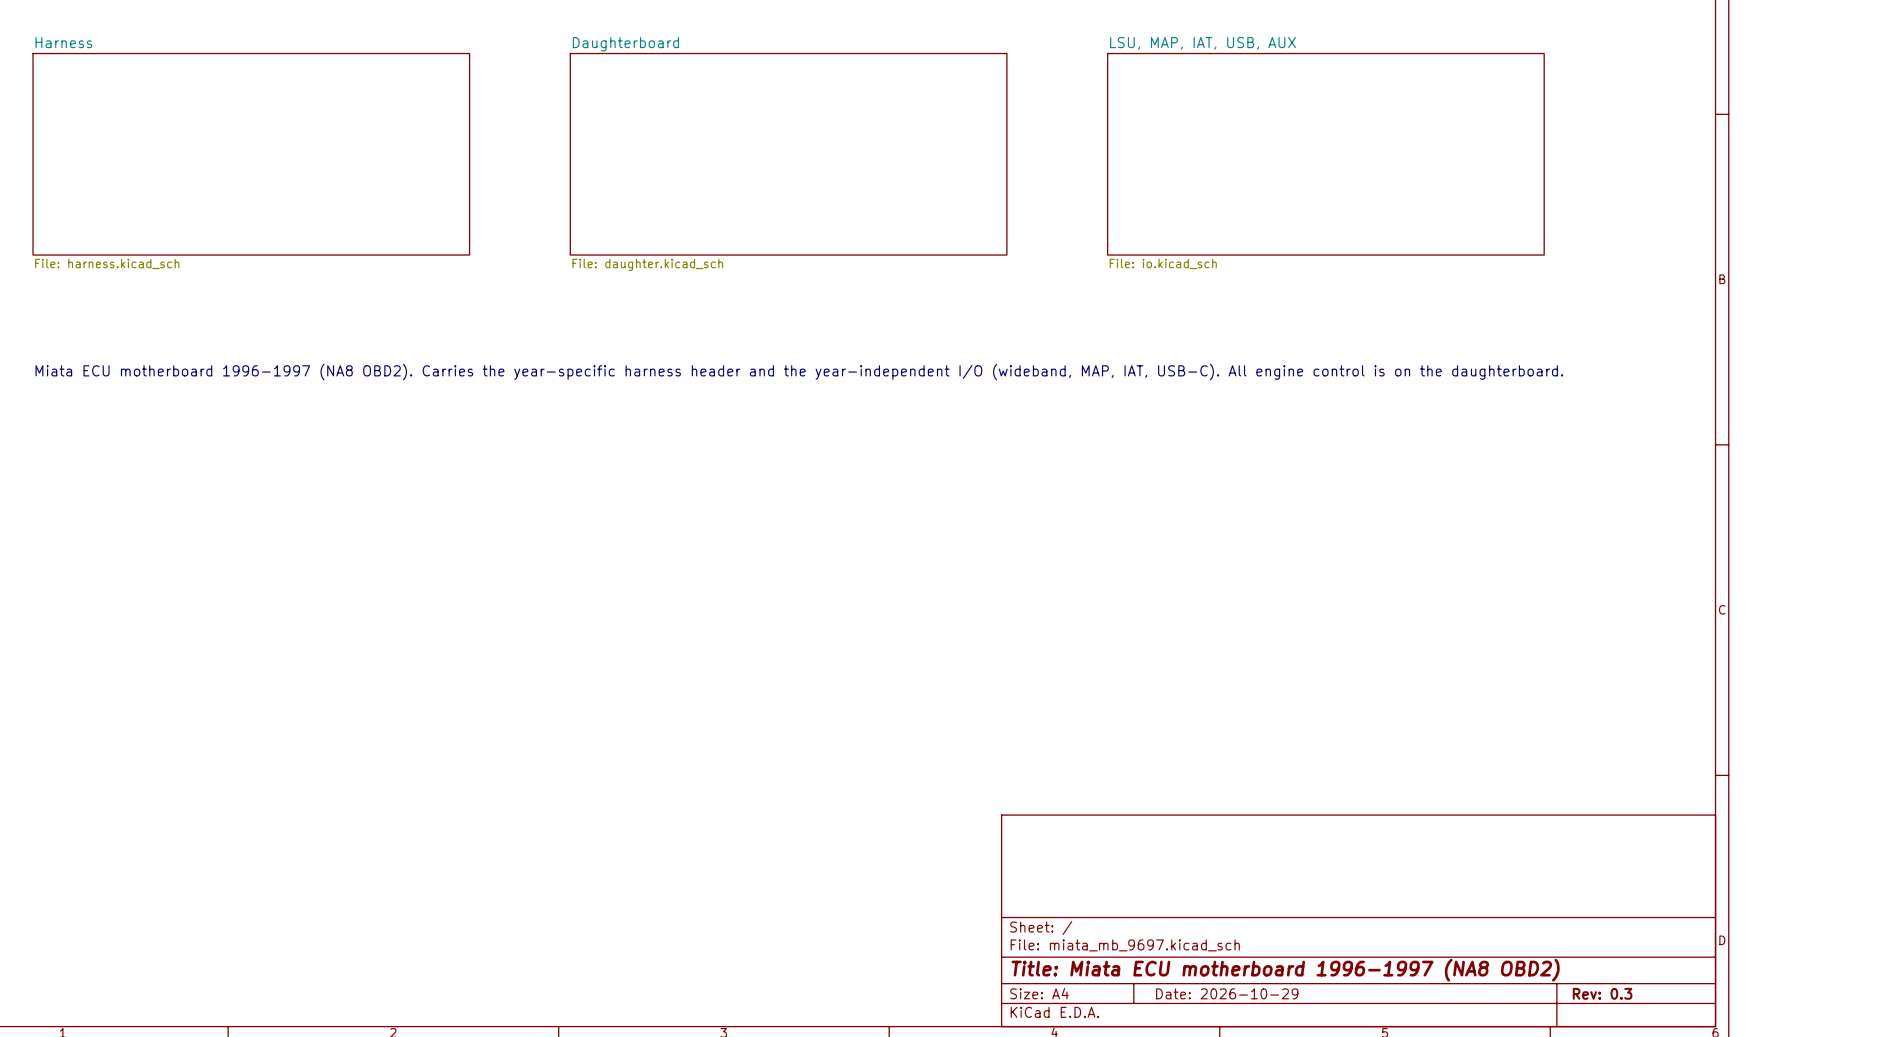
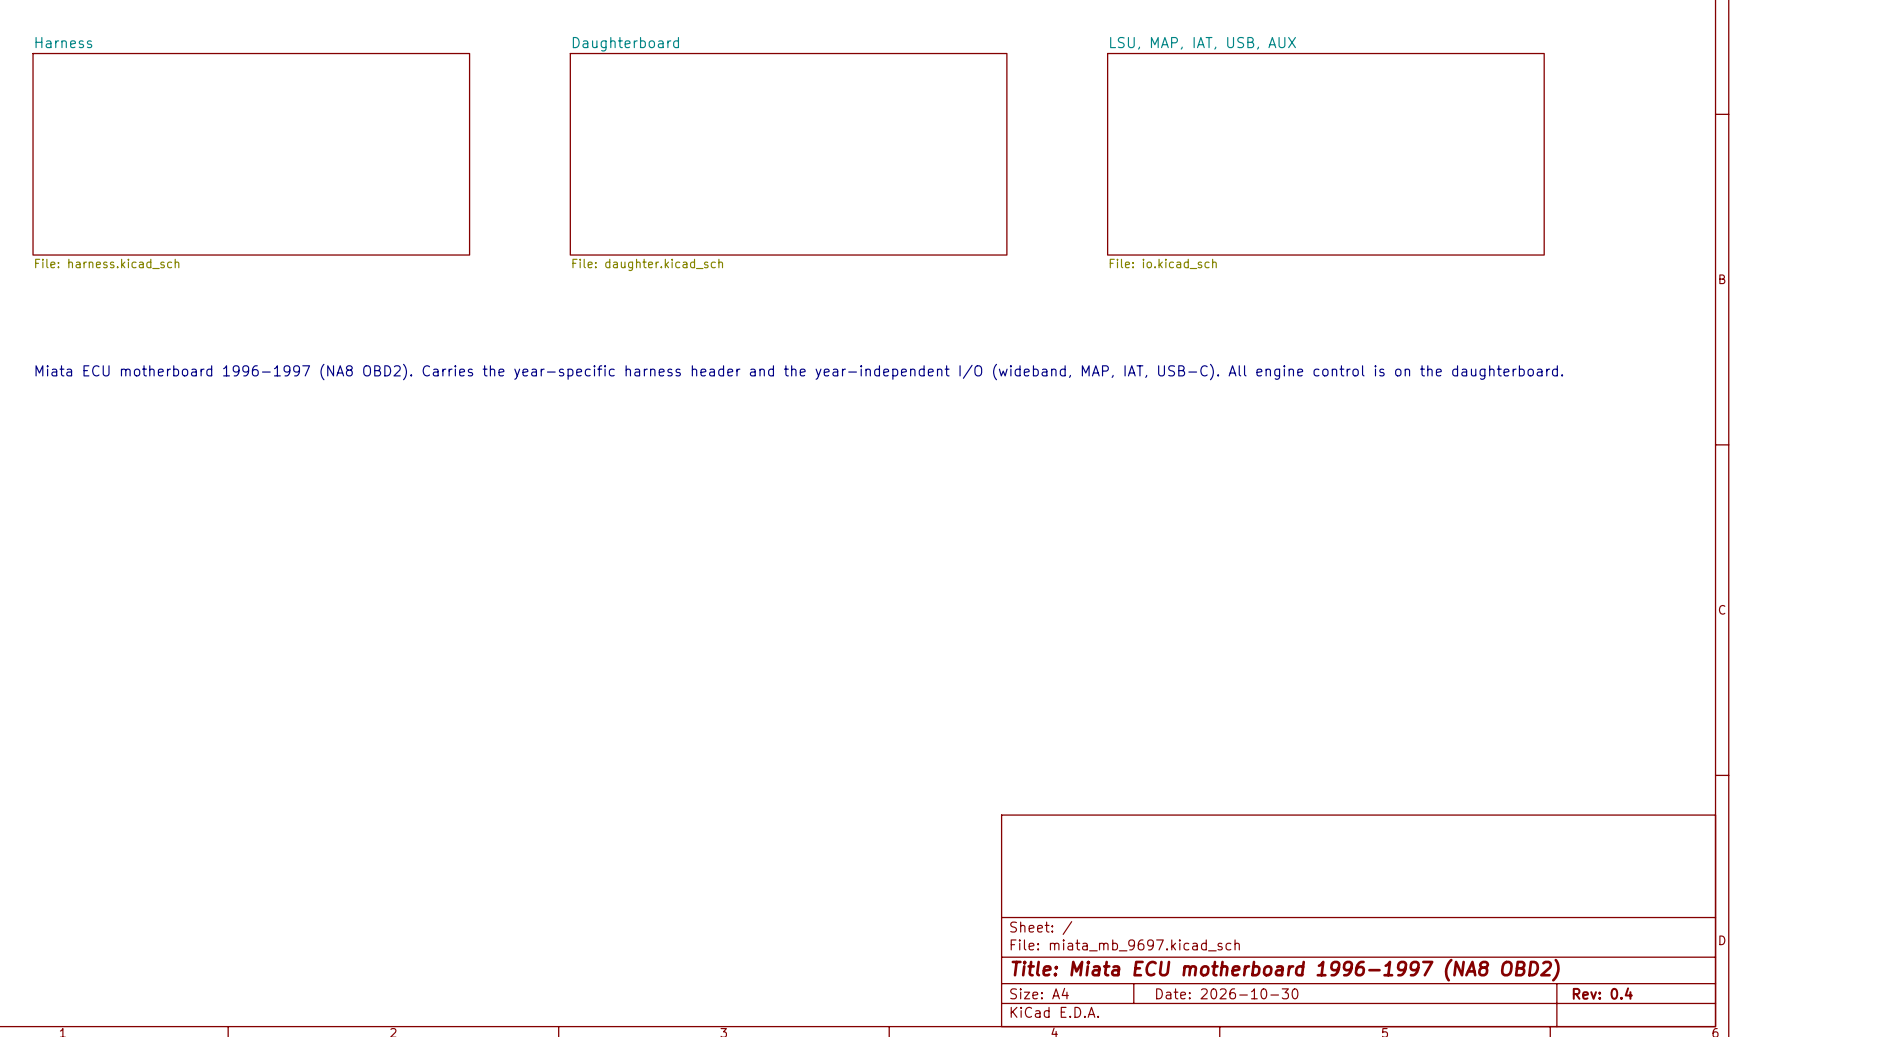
title block: Date: 2026-10-29 (1227, 993) -> Date: 2026-10-30 (1227, 993)
title block: Rev: 0.3 (1602, 993) -> Rev: 0.4 (1602, 993)

